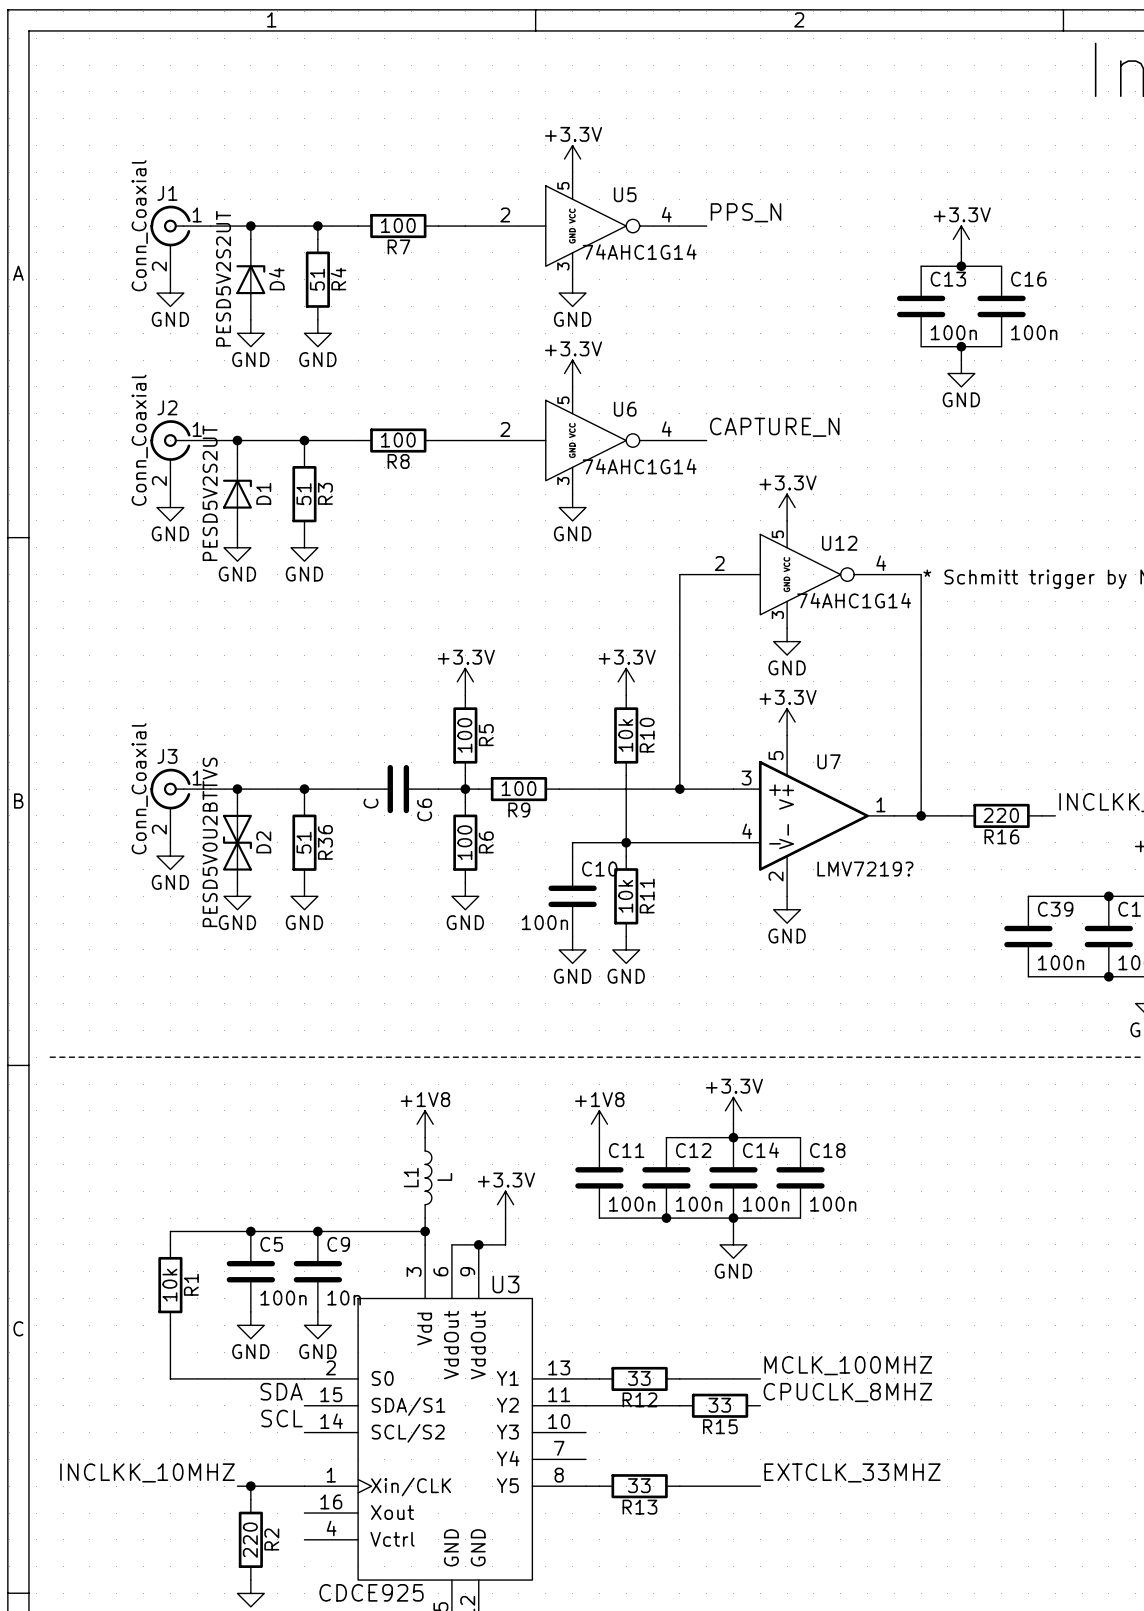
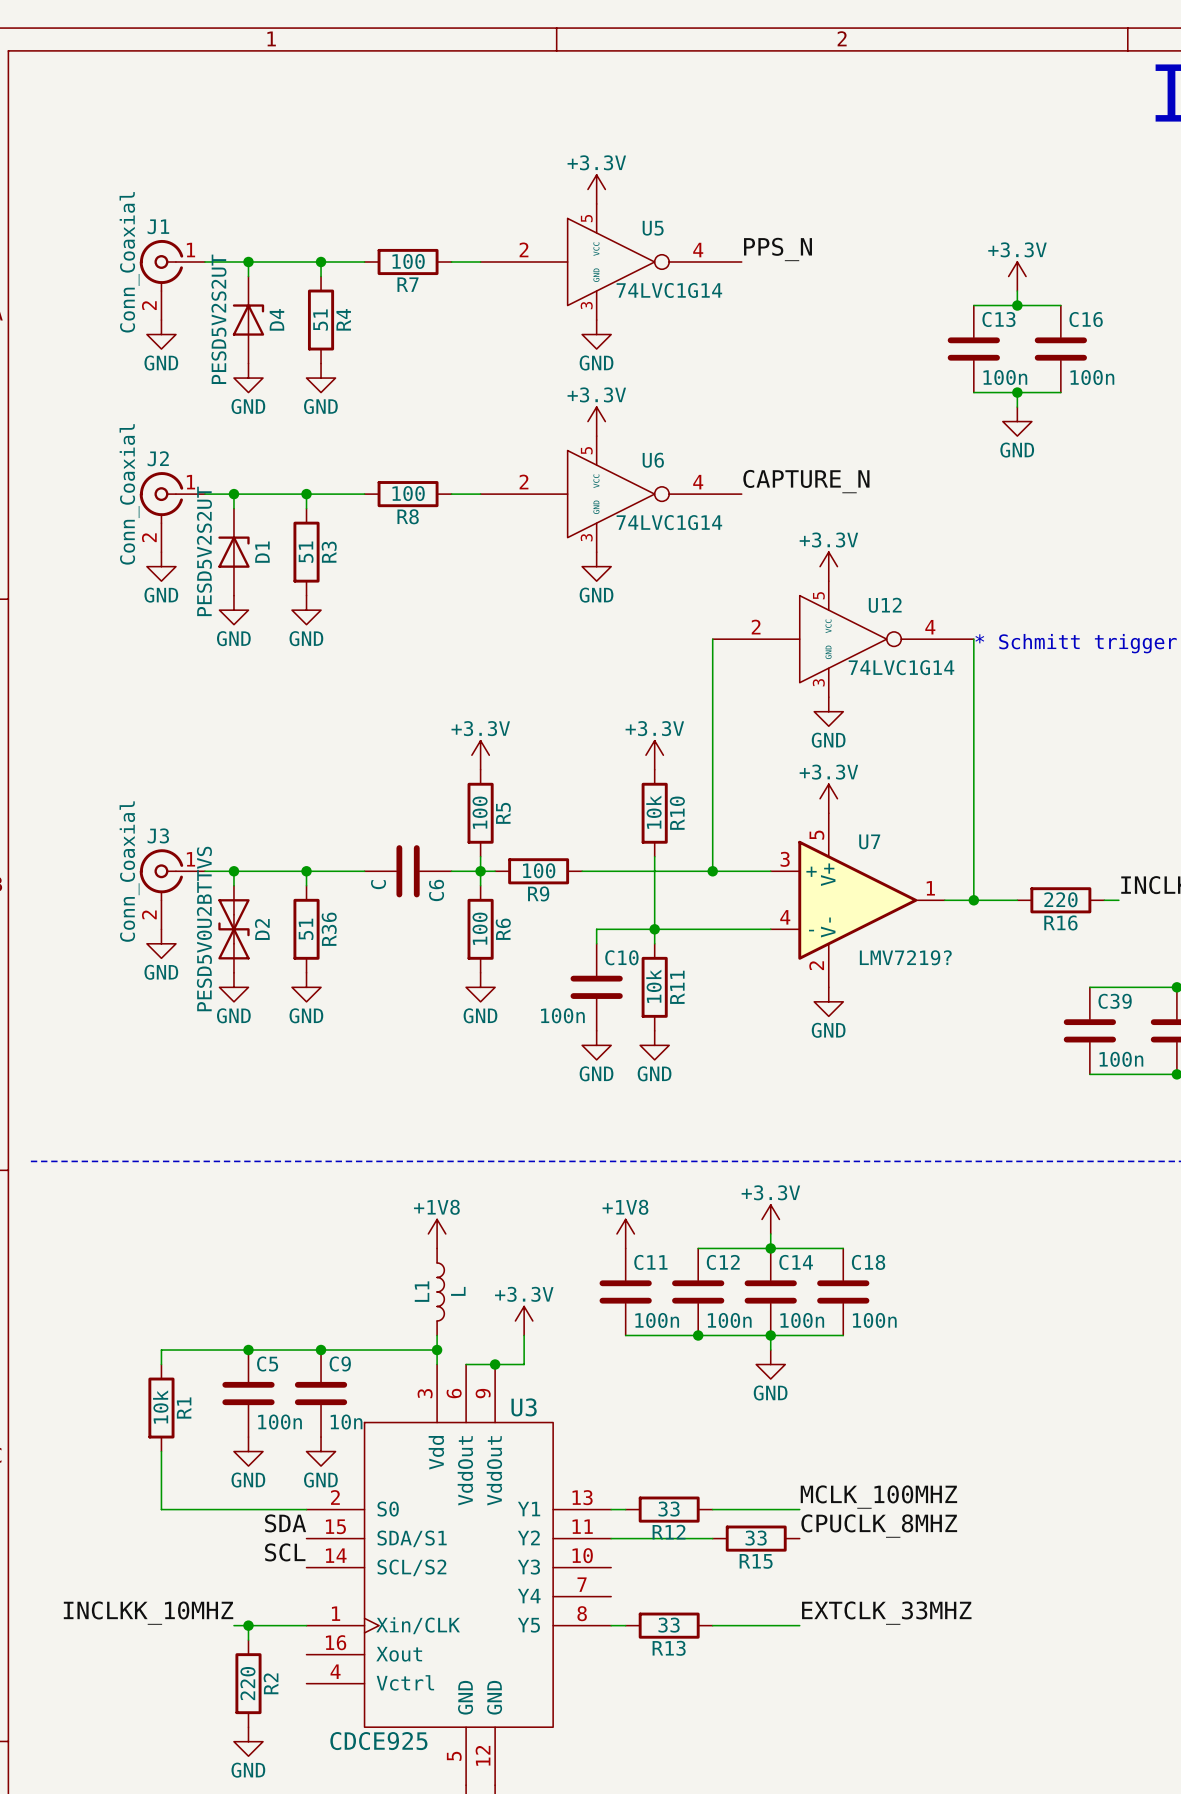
U5 value: 74AHC1G14 (639, 252) -> 74LVC1G14 (669, 290)
U6 value: 74AHC1G14 (639, 466) -> 74LVC1G14 (669, 522)
U12 value: 74AHC1G14 (854, 600) -> 74LVC1G14 (901, 667)

